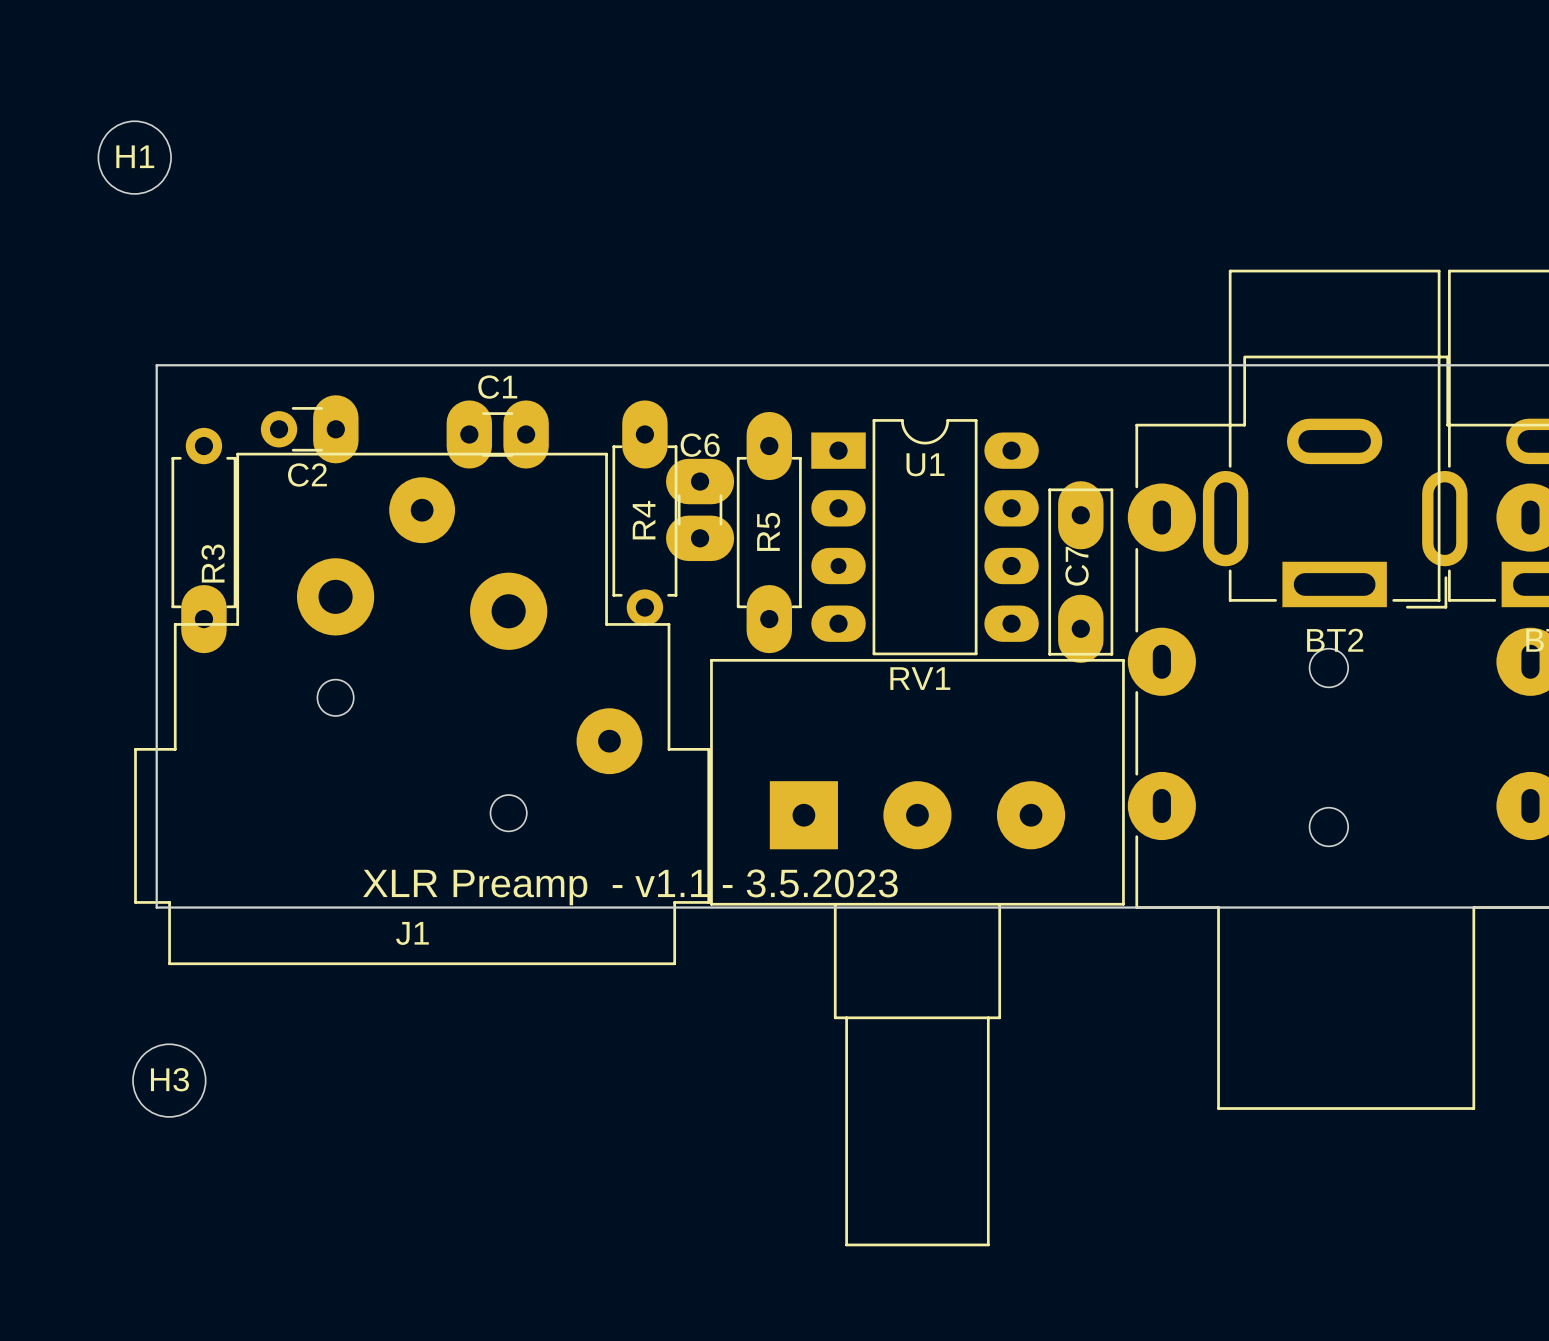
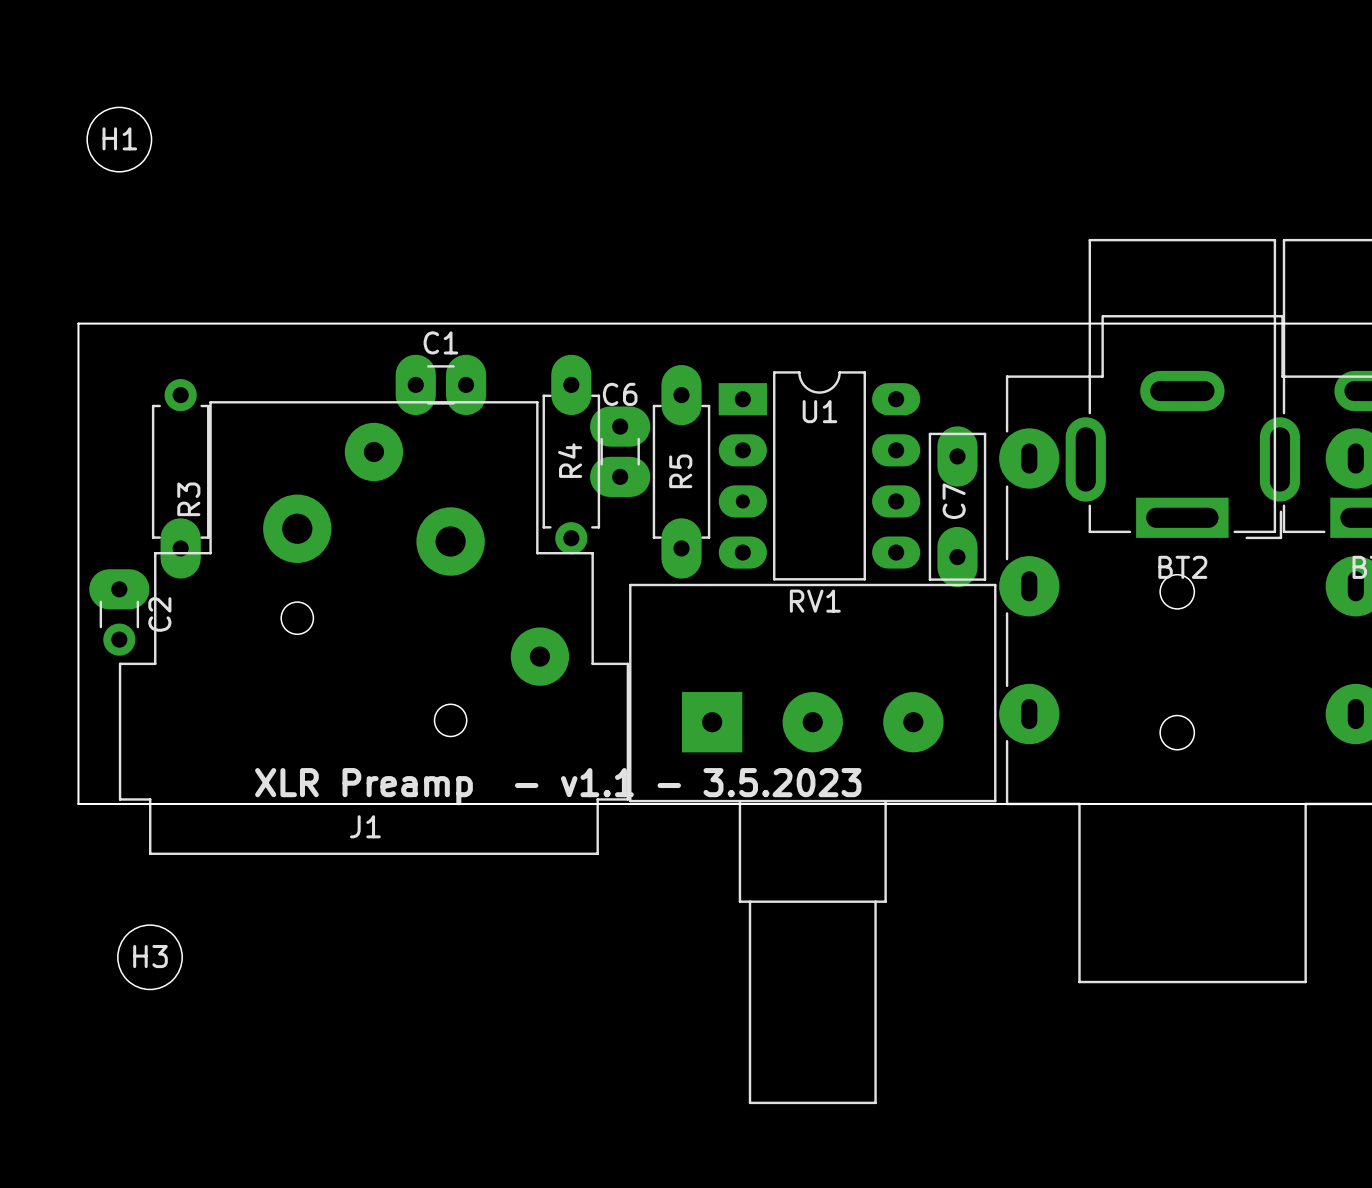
board edge: (156, 365) (156, 907) -> (138, 323) (78, 323) (78, 803) (138, 803)
C2 rotation: 0° (309, 429) -> 90° counterclockwise (119, 612)
C2 position: (309, 429) -> (119, 612)

